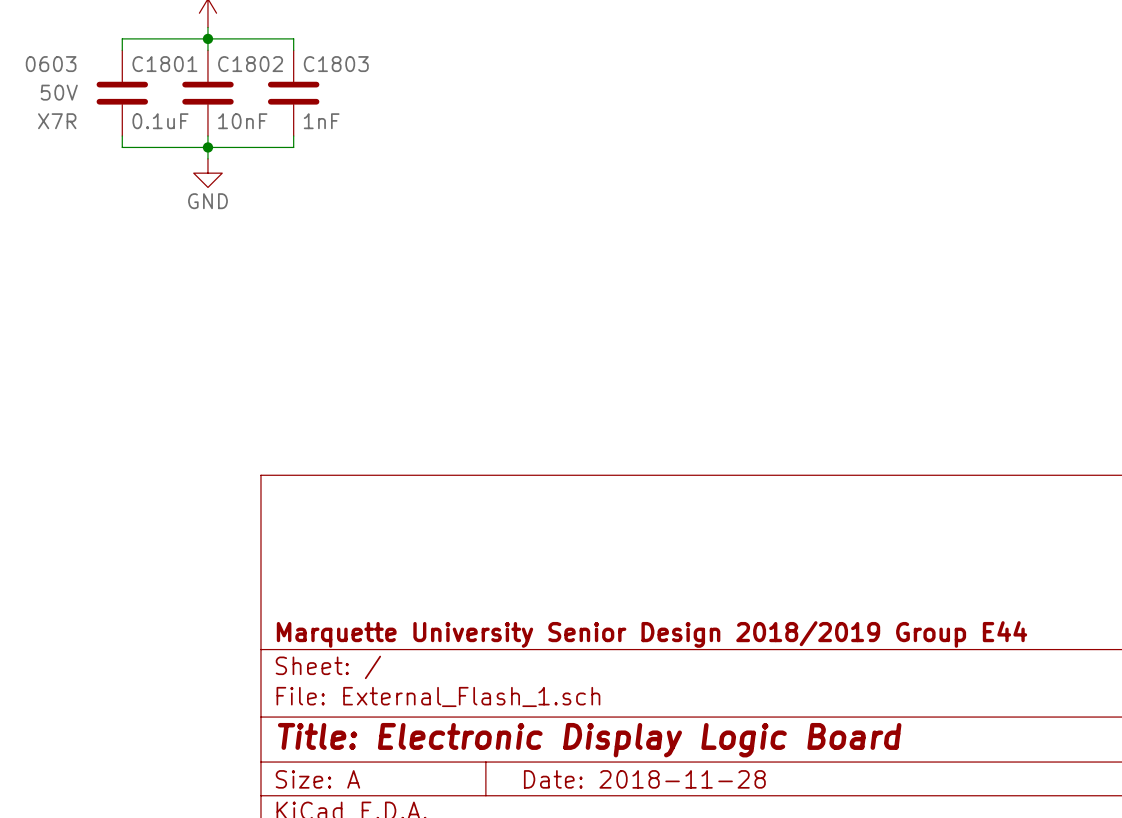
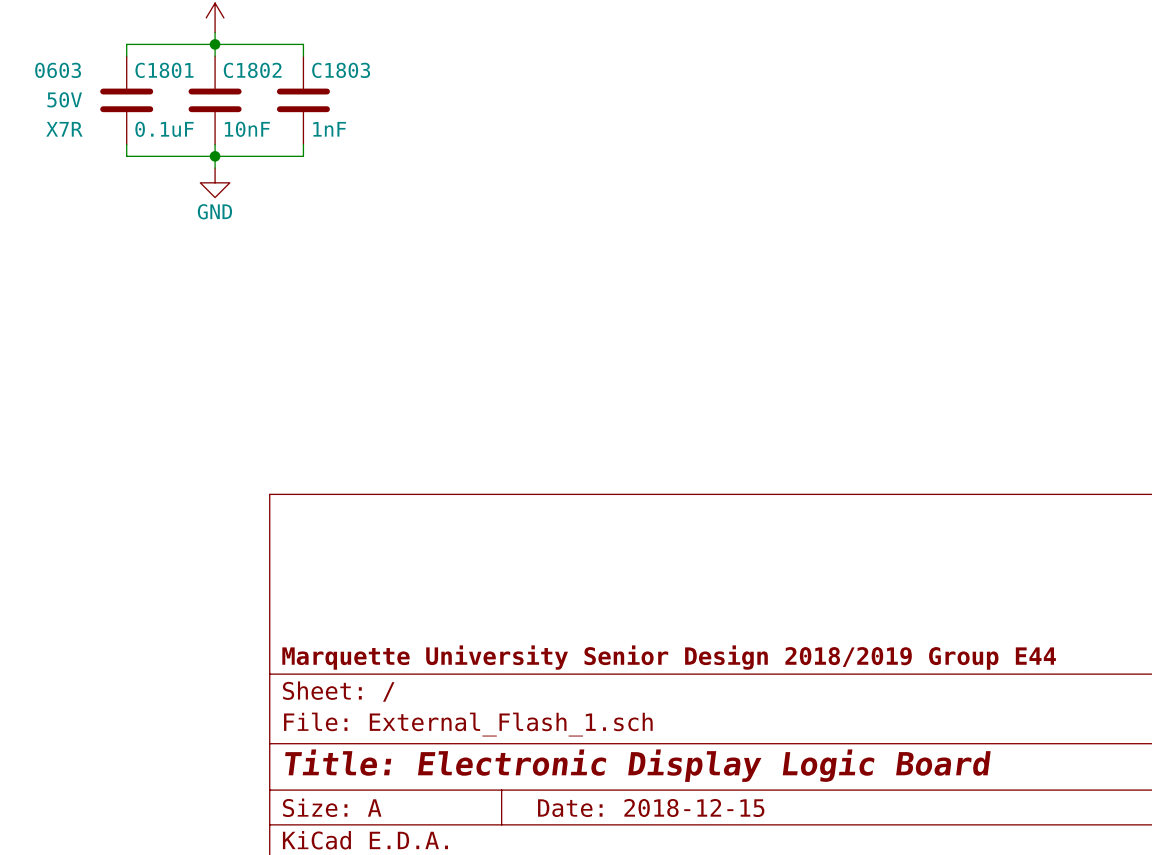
title block: Date: 2018-11-28 (644, 779) -> Date: 2018-12-15 (651, 808)

